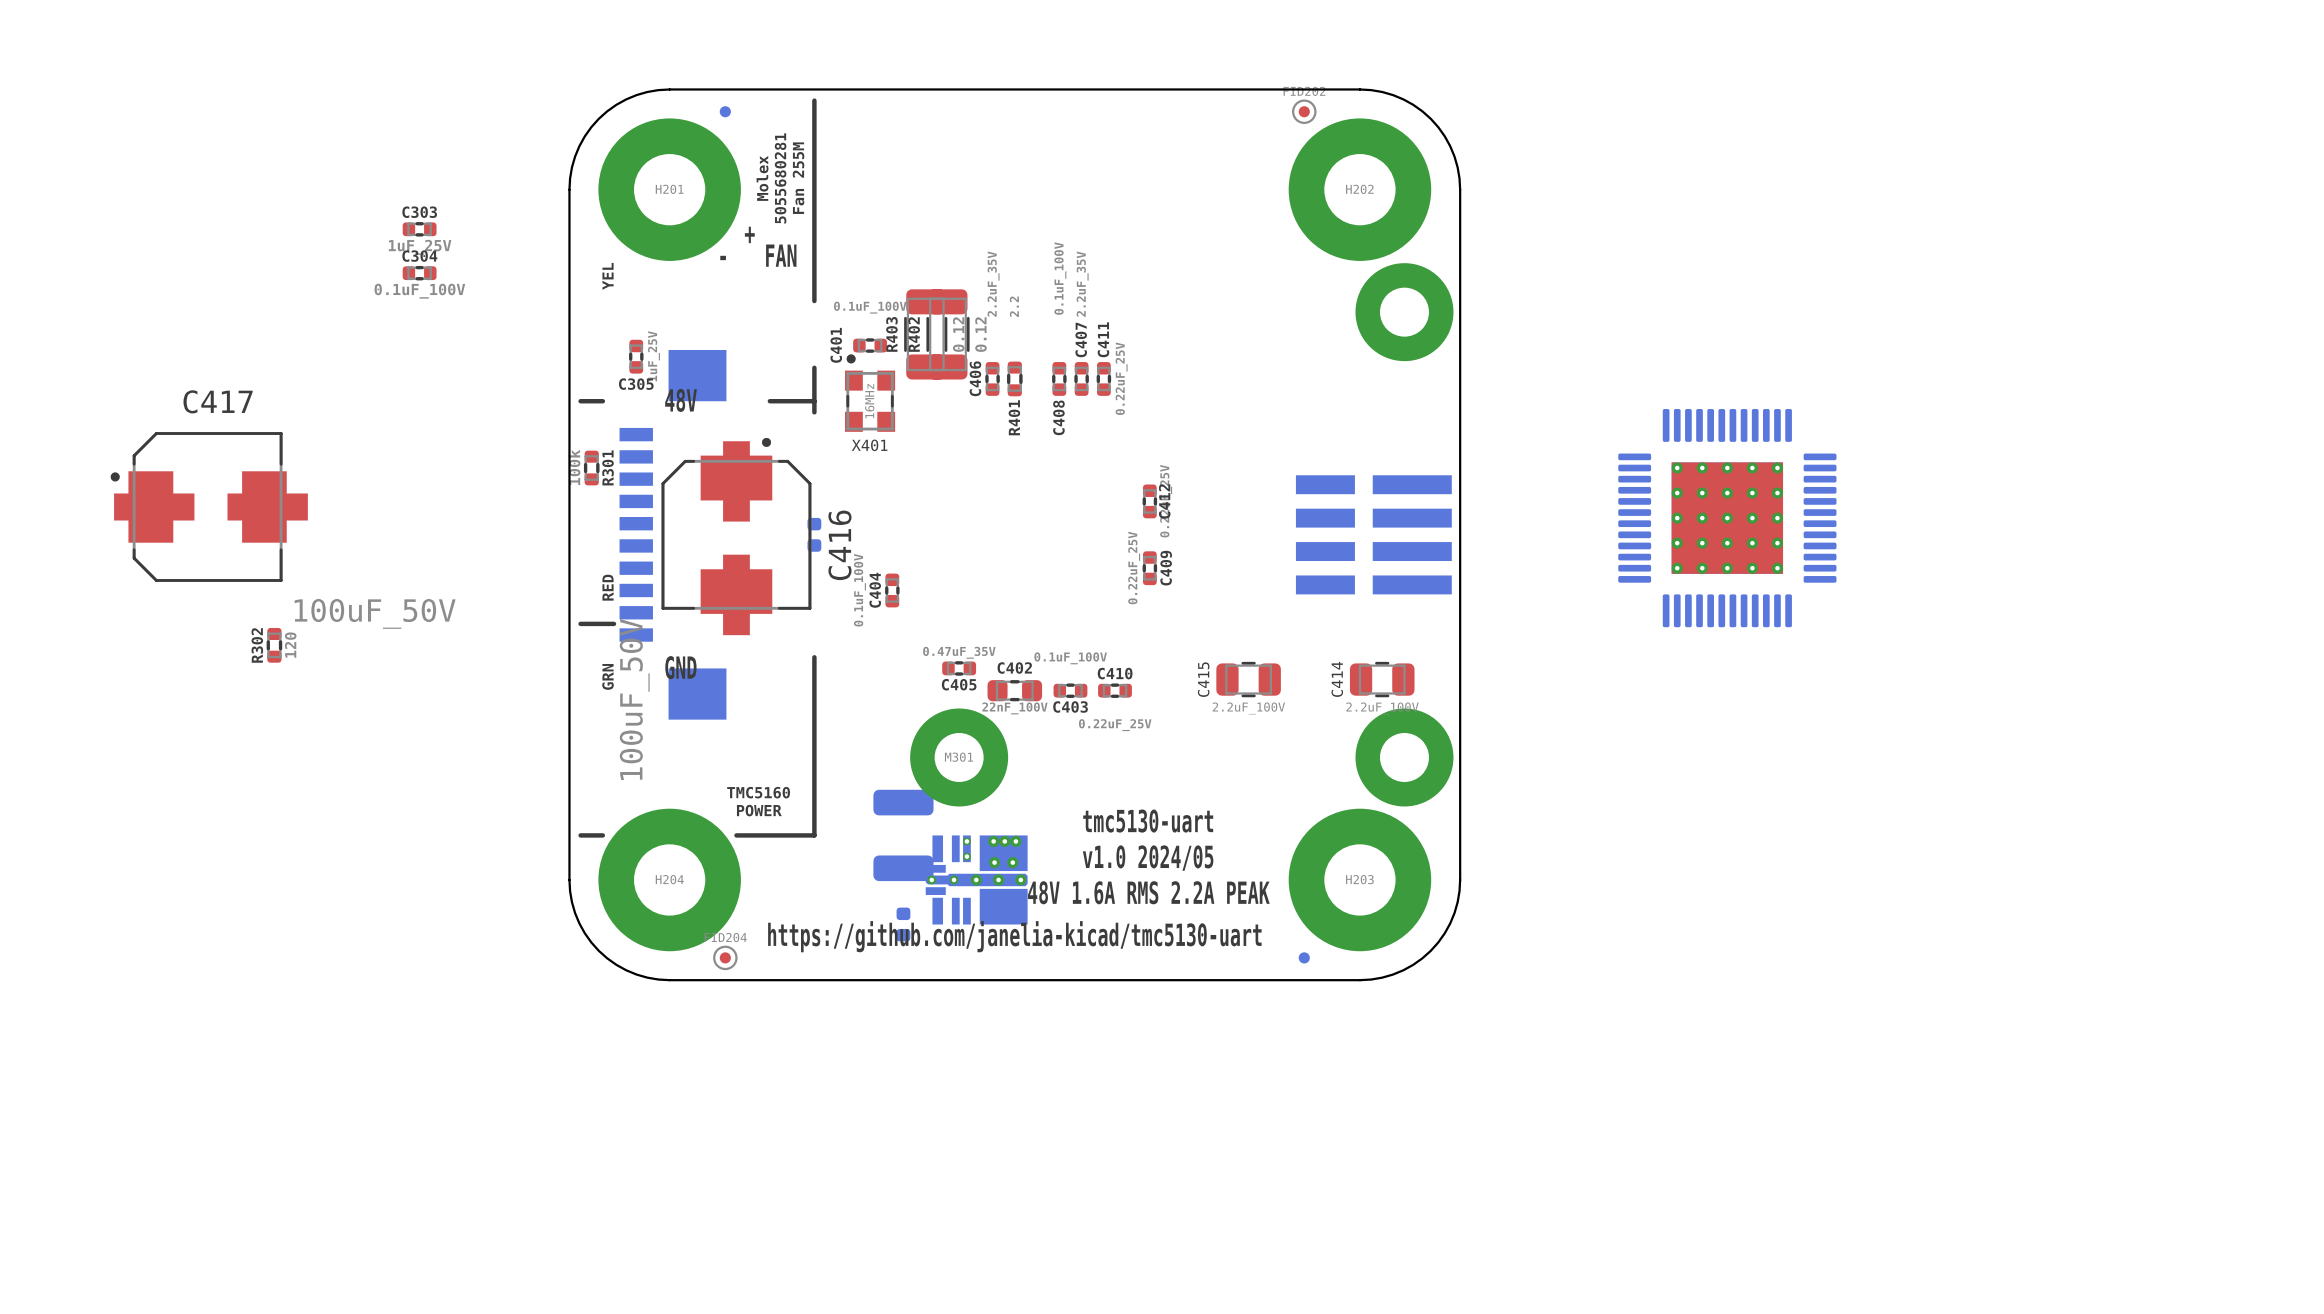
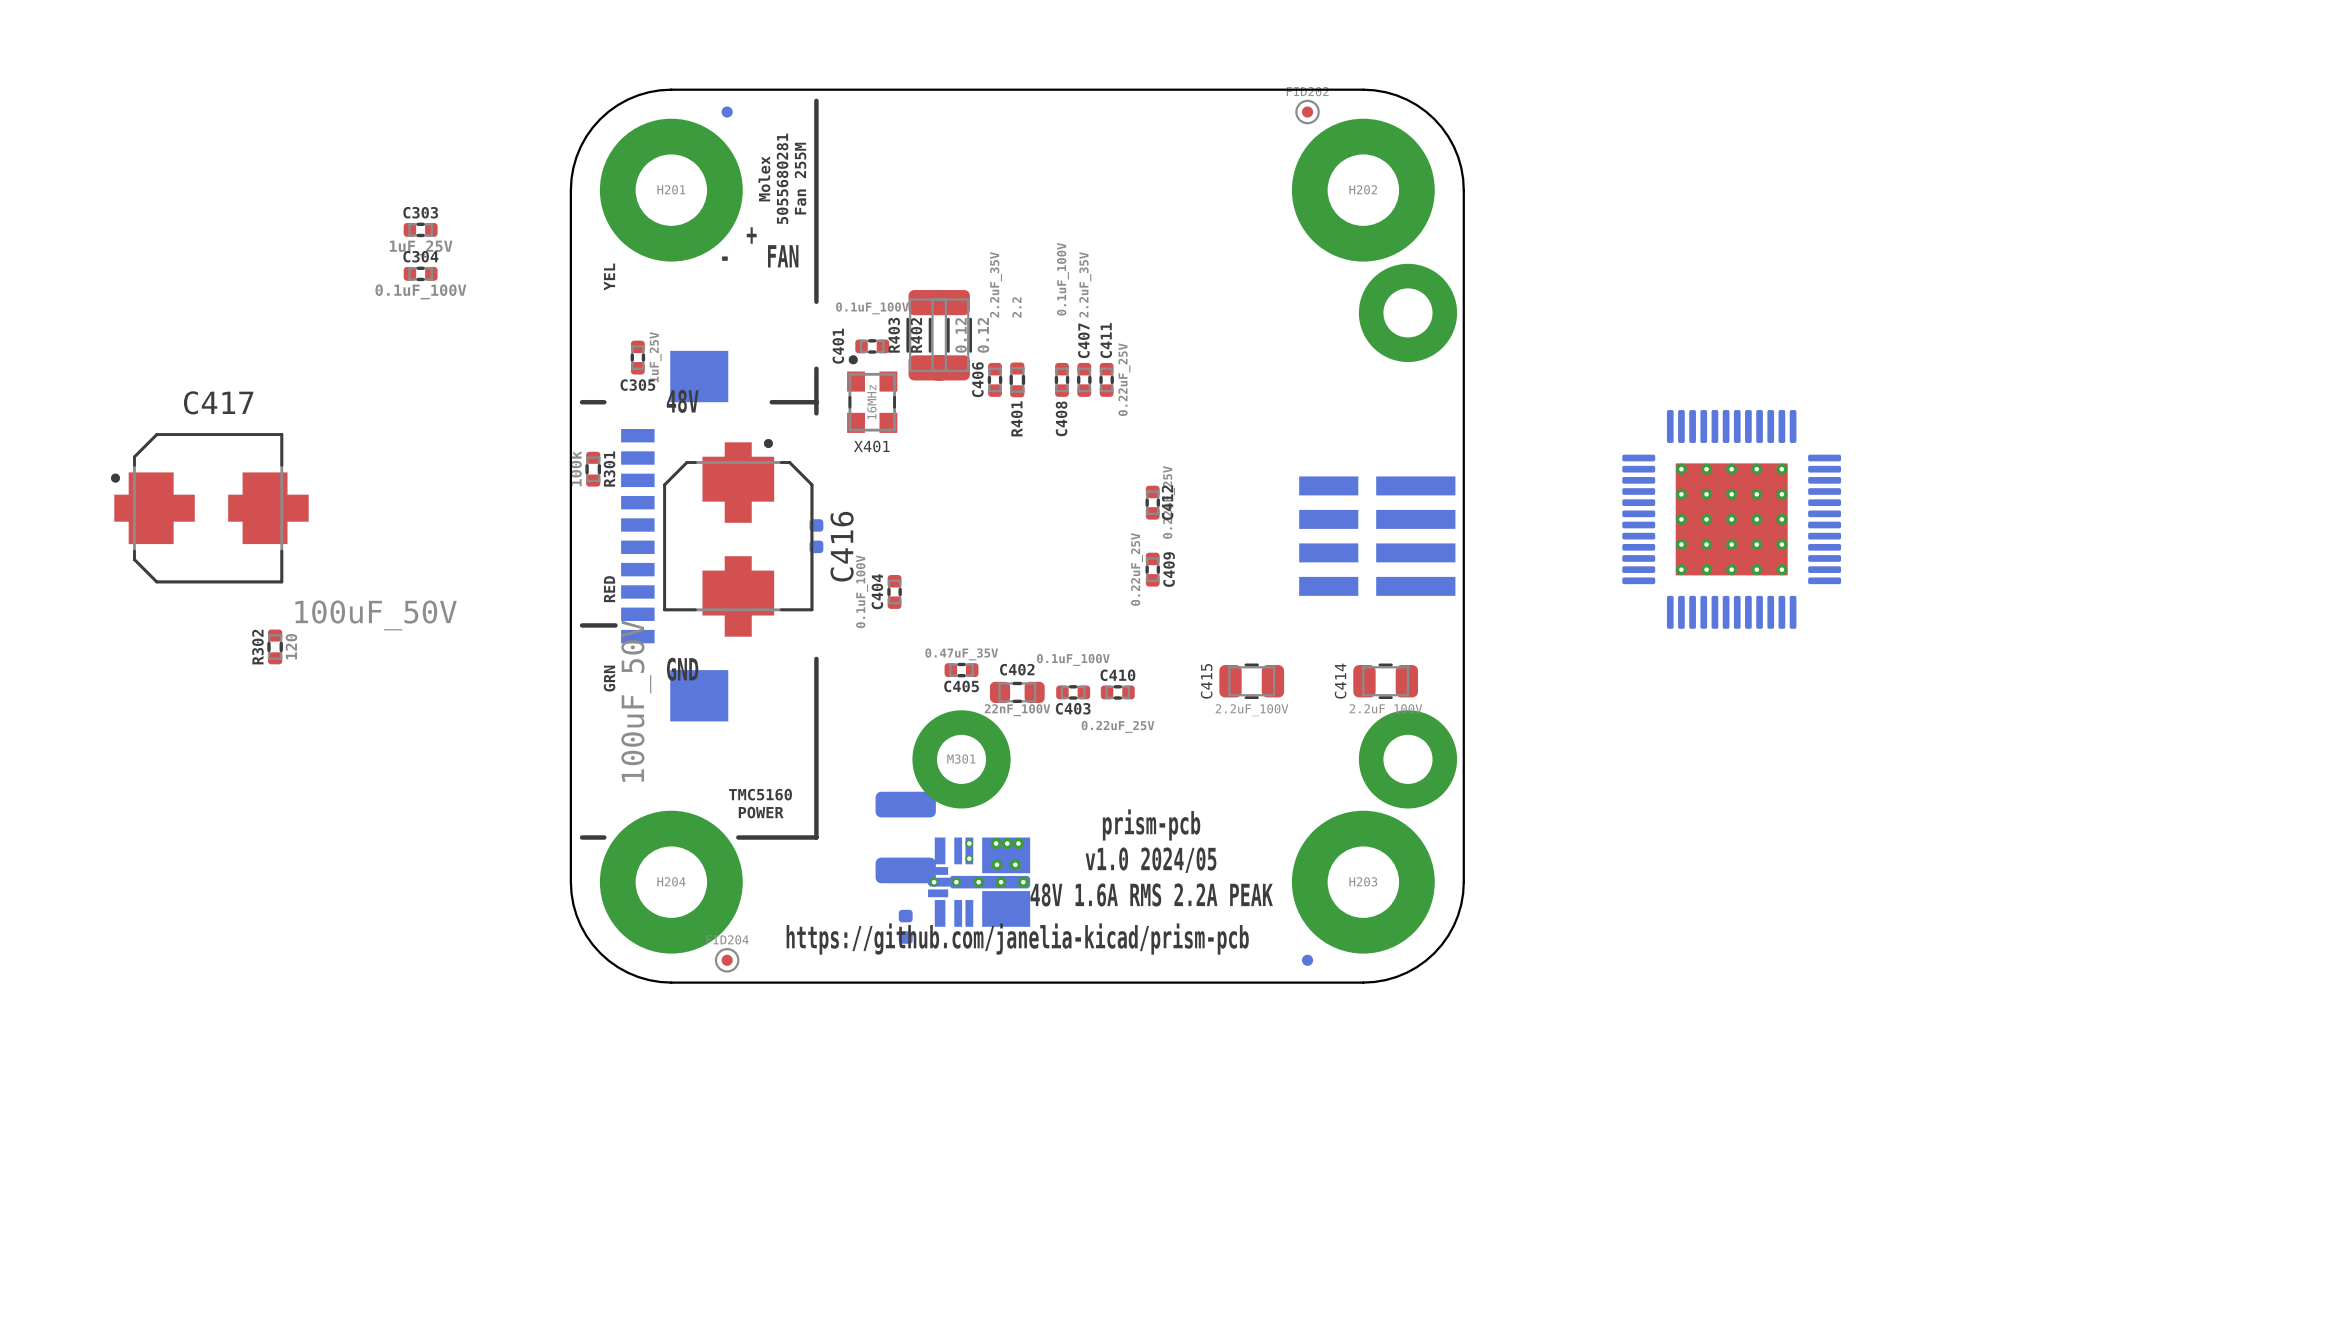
text: tmc5130-uart (1148, 821) -> prism-pcb (1151, 824)
text: https://github.com/janelia-kicad/tmc5130-uart (1014, 936) -> https://github.com/janelia-kicad/prism-pcb (1017, 939)

